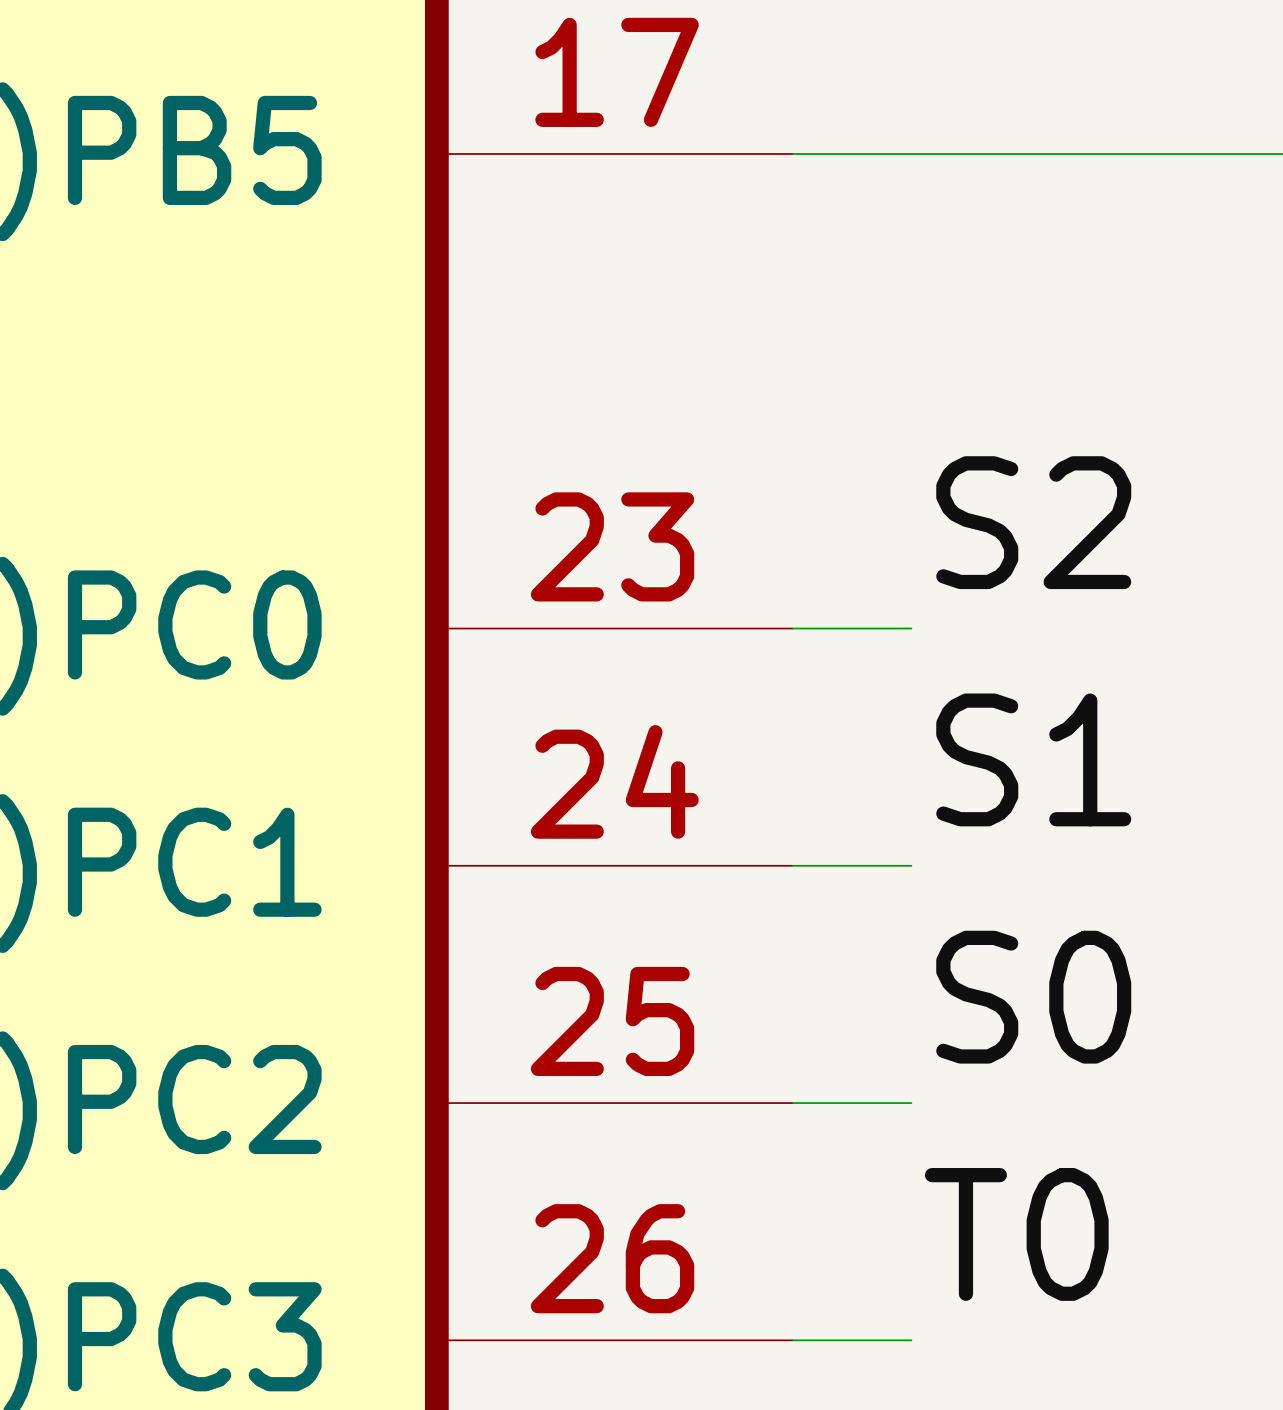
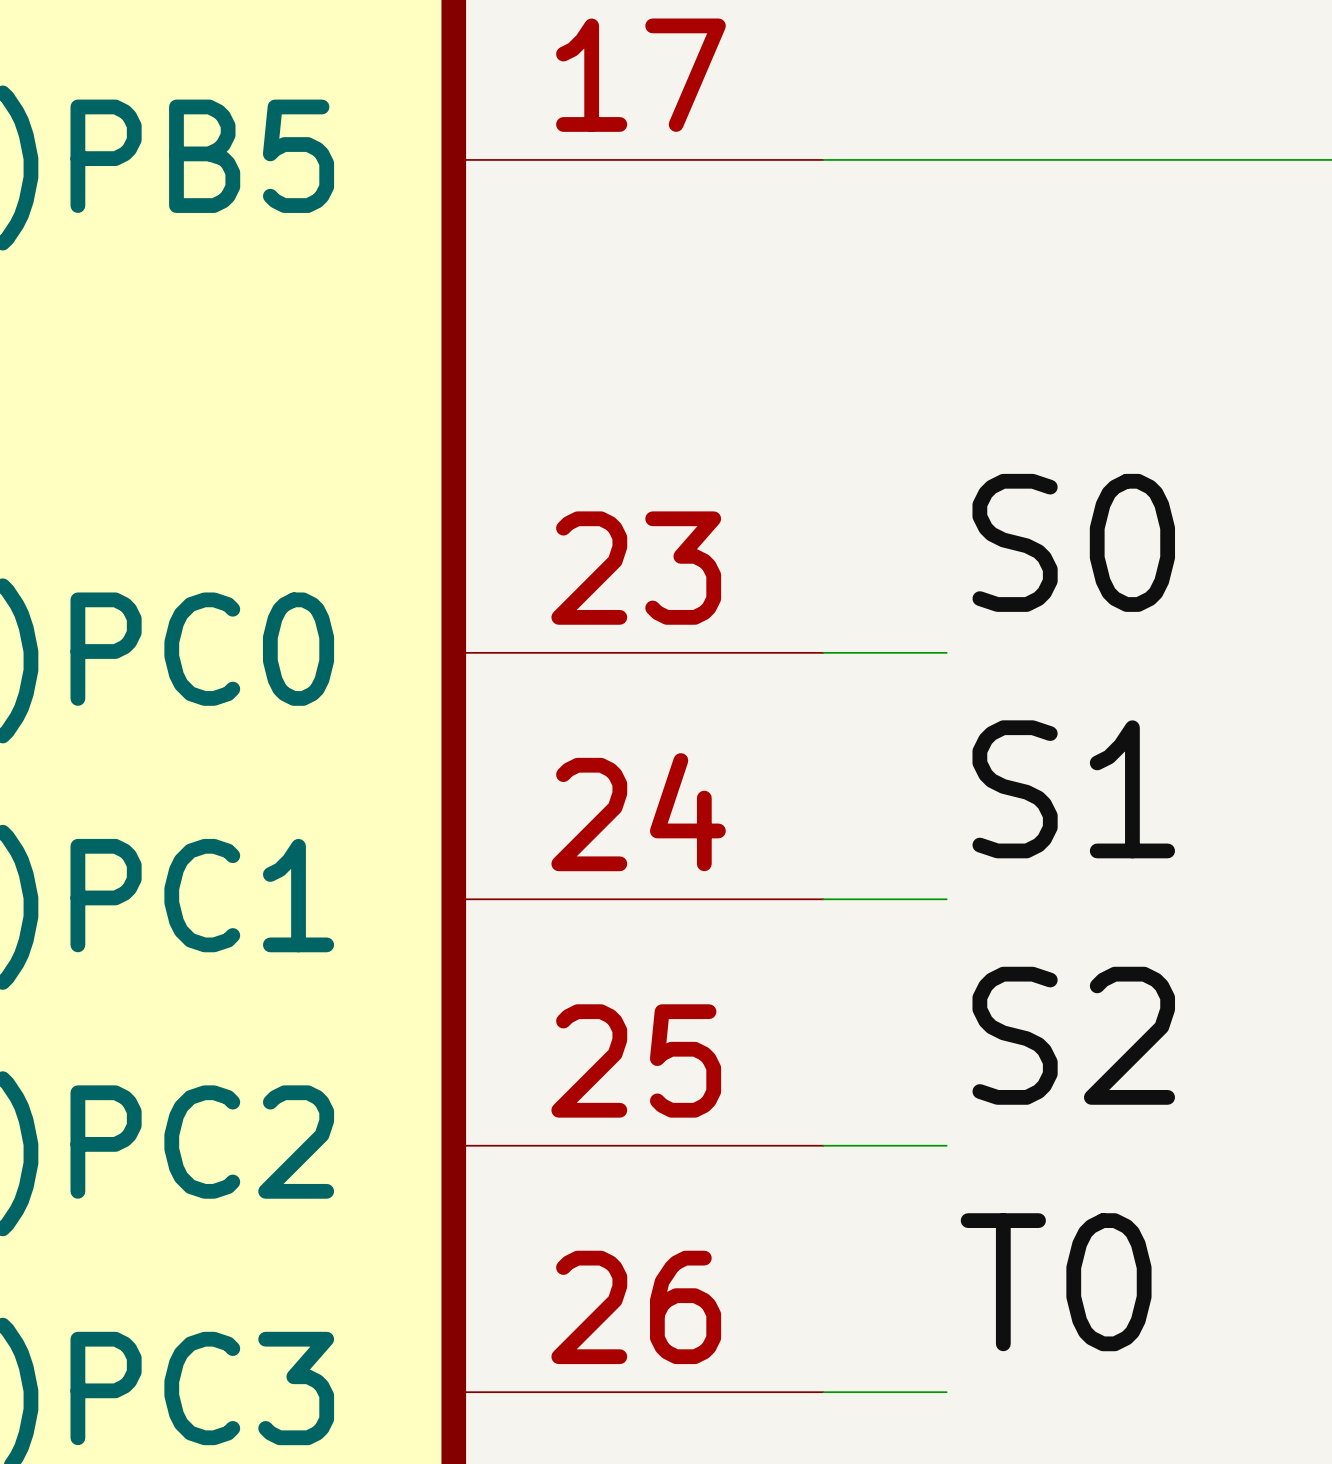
label: S2 (1033, 522) -> S0 (1073, 542)
label: S0 (1033, 997) -> S2 (1073, 1035)

